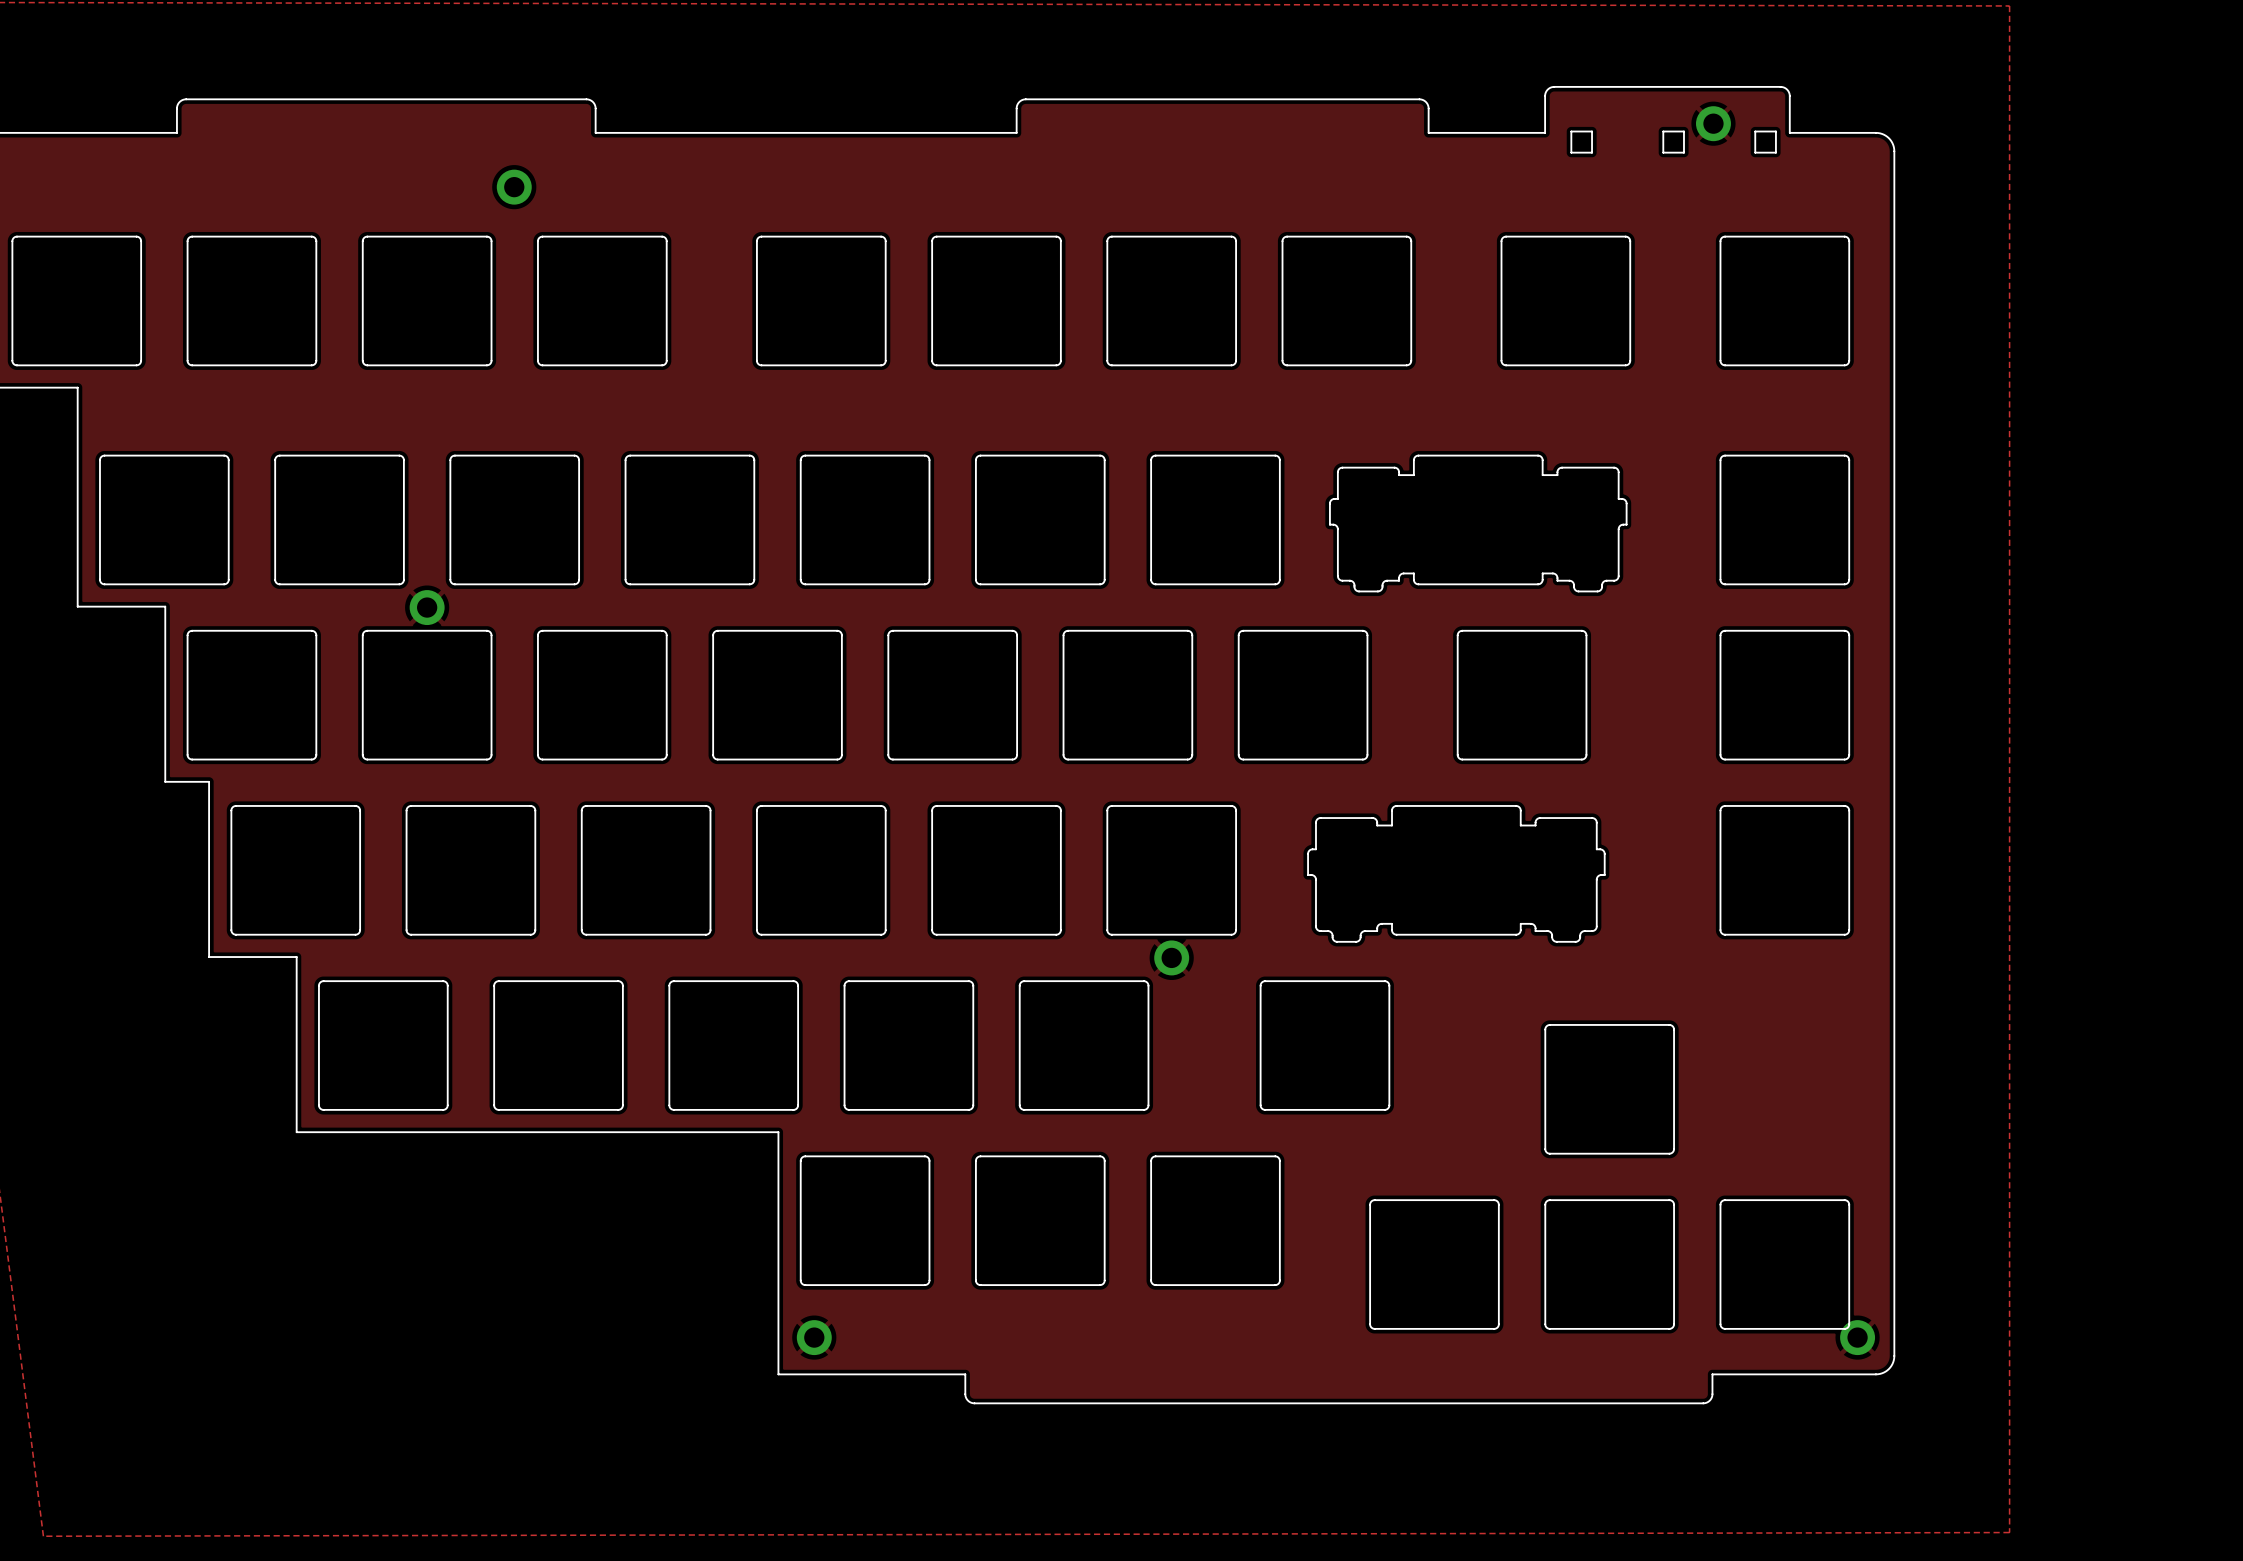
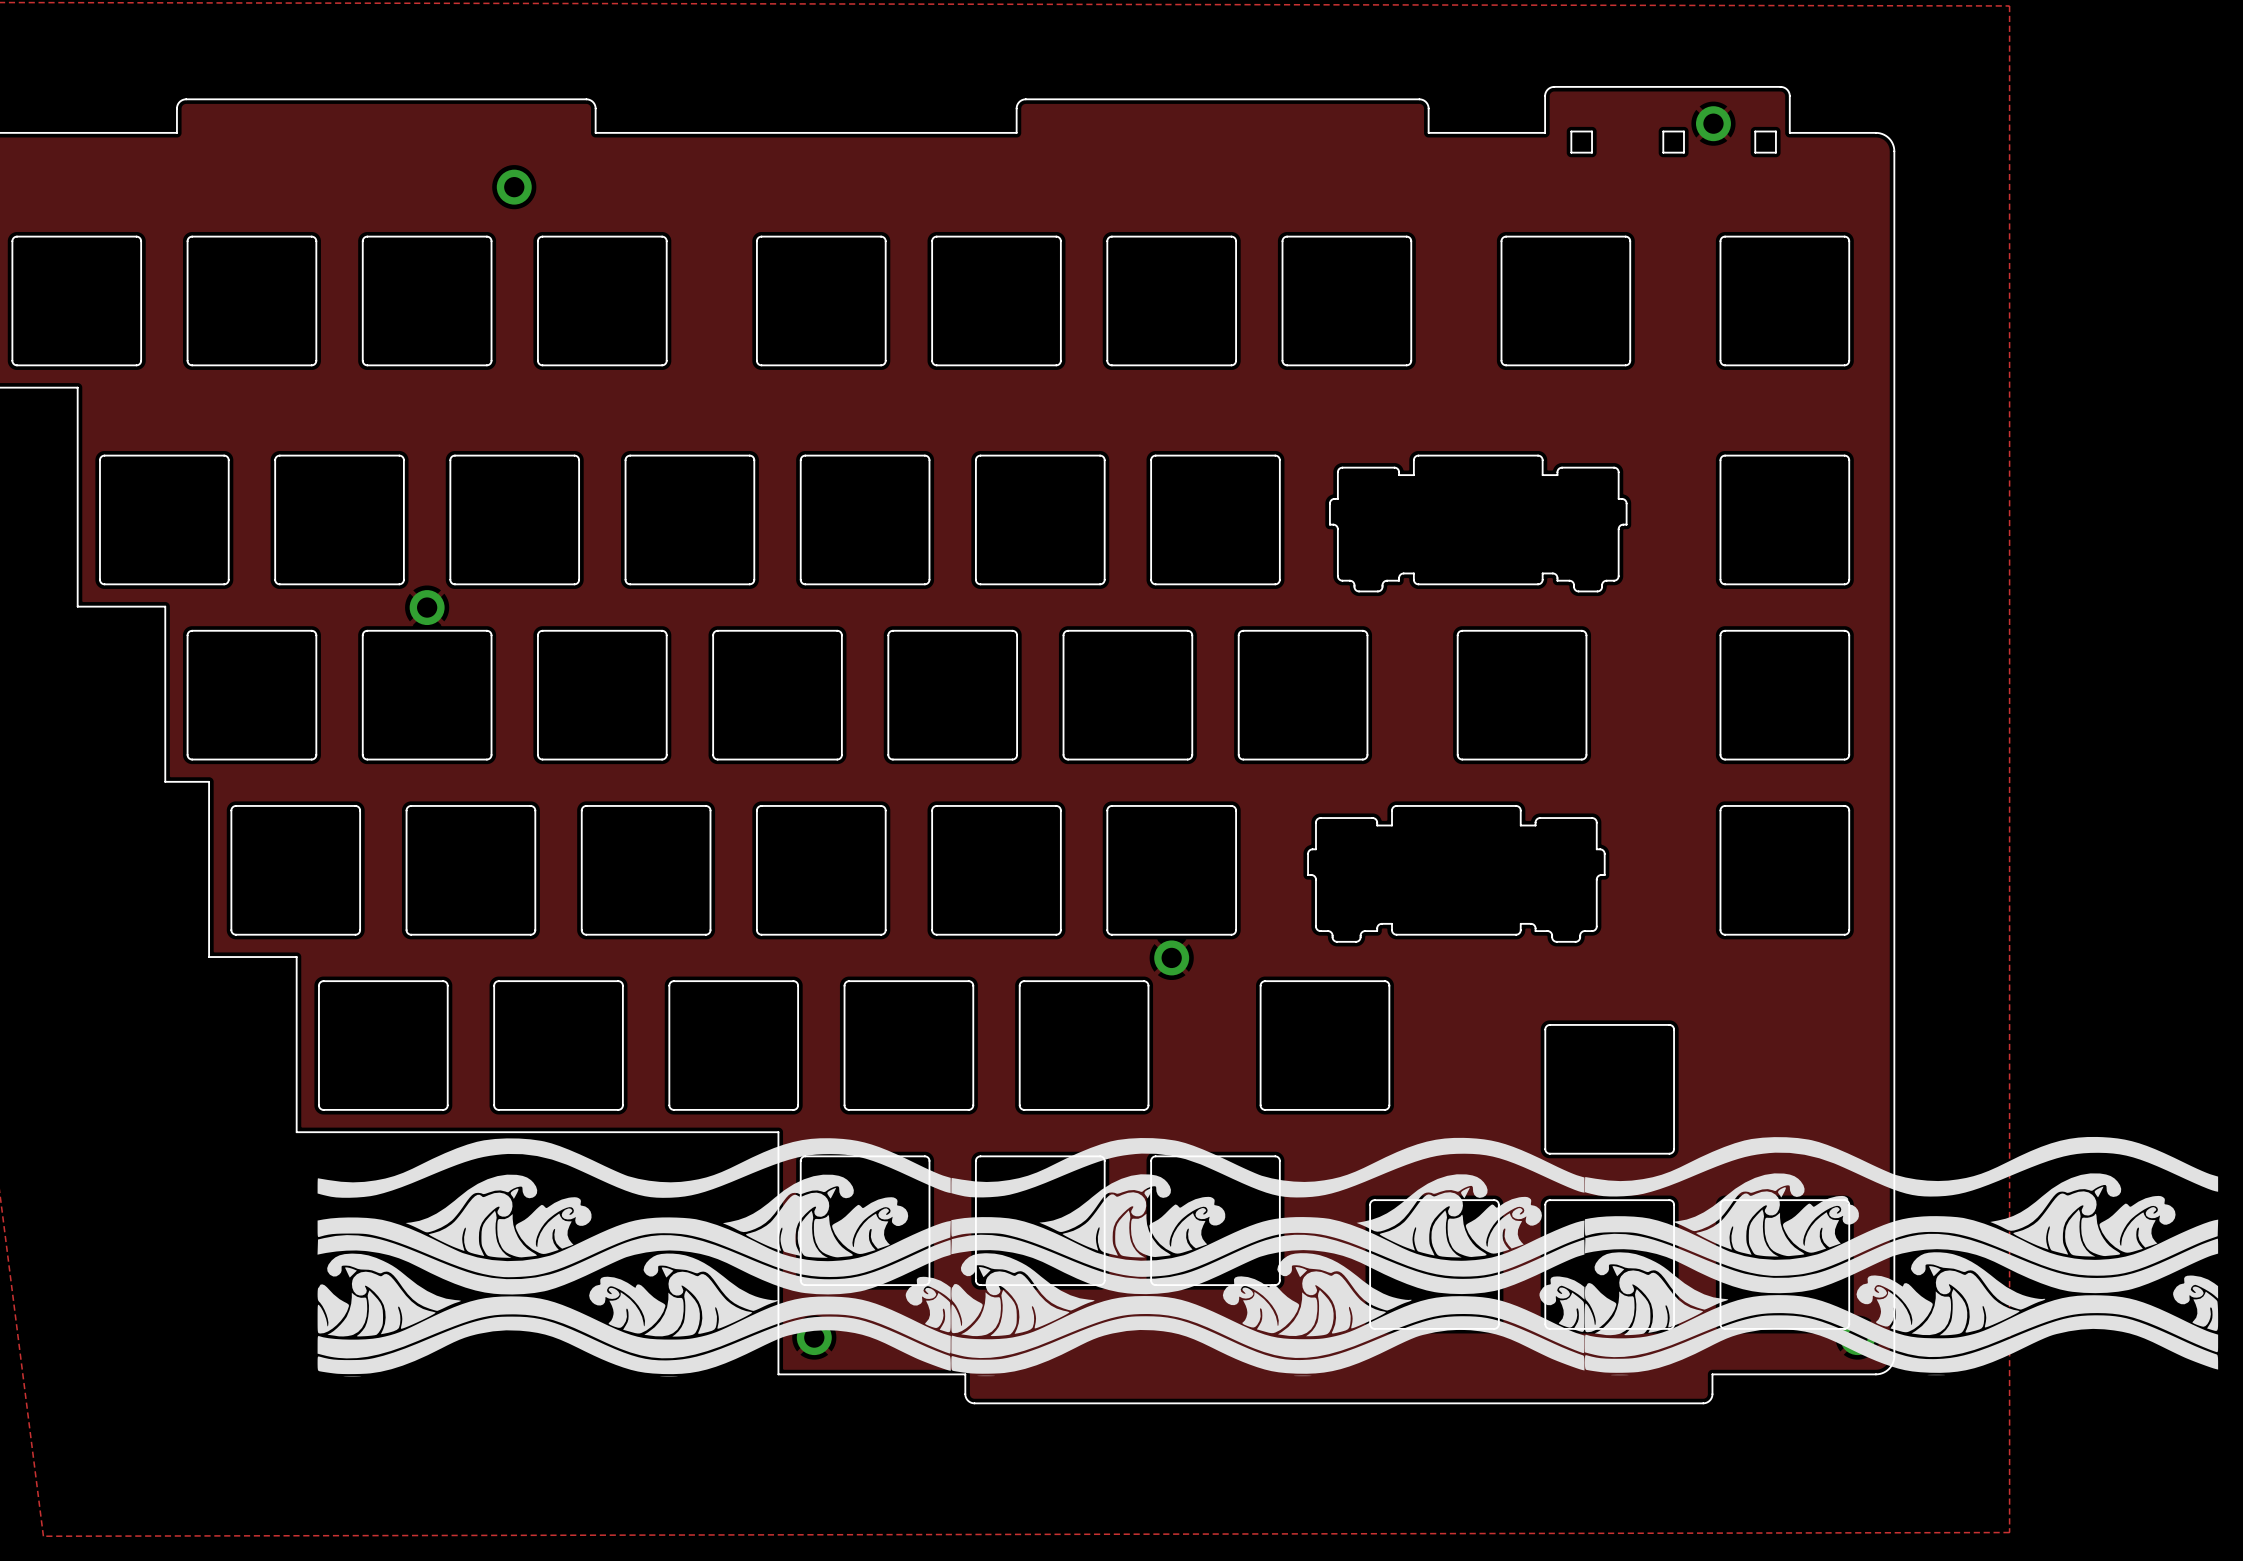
drawing: none -> [317, 1136, 2219, 1377]

